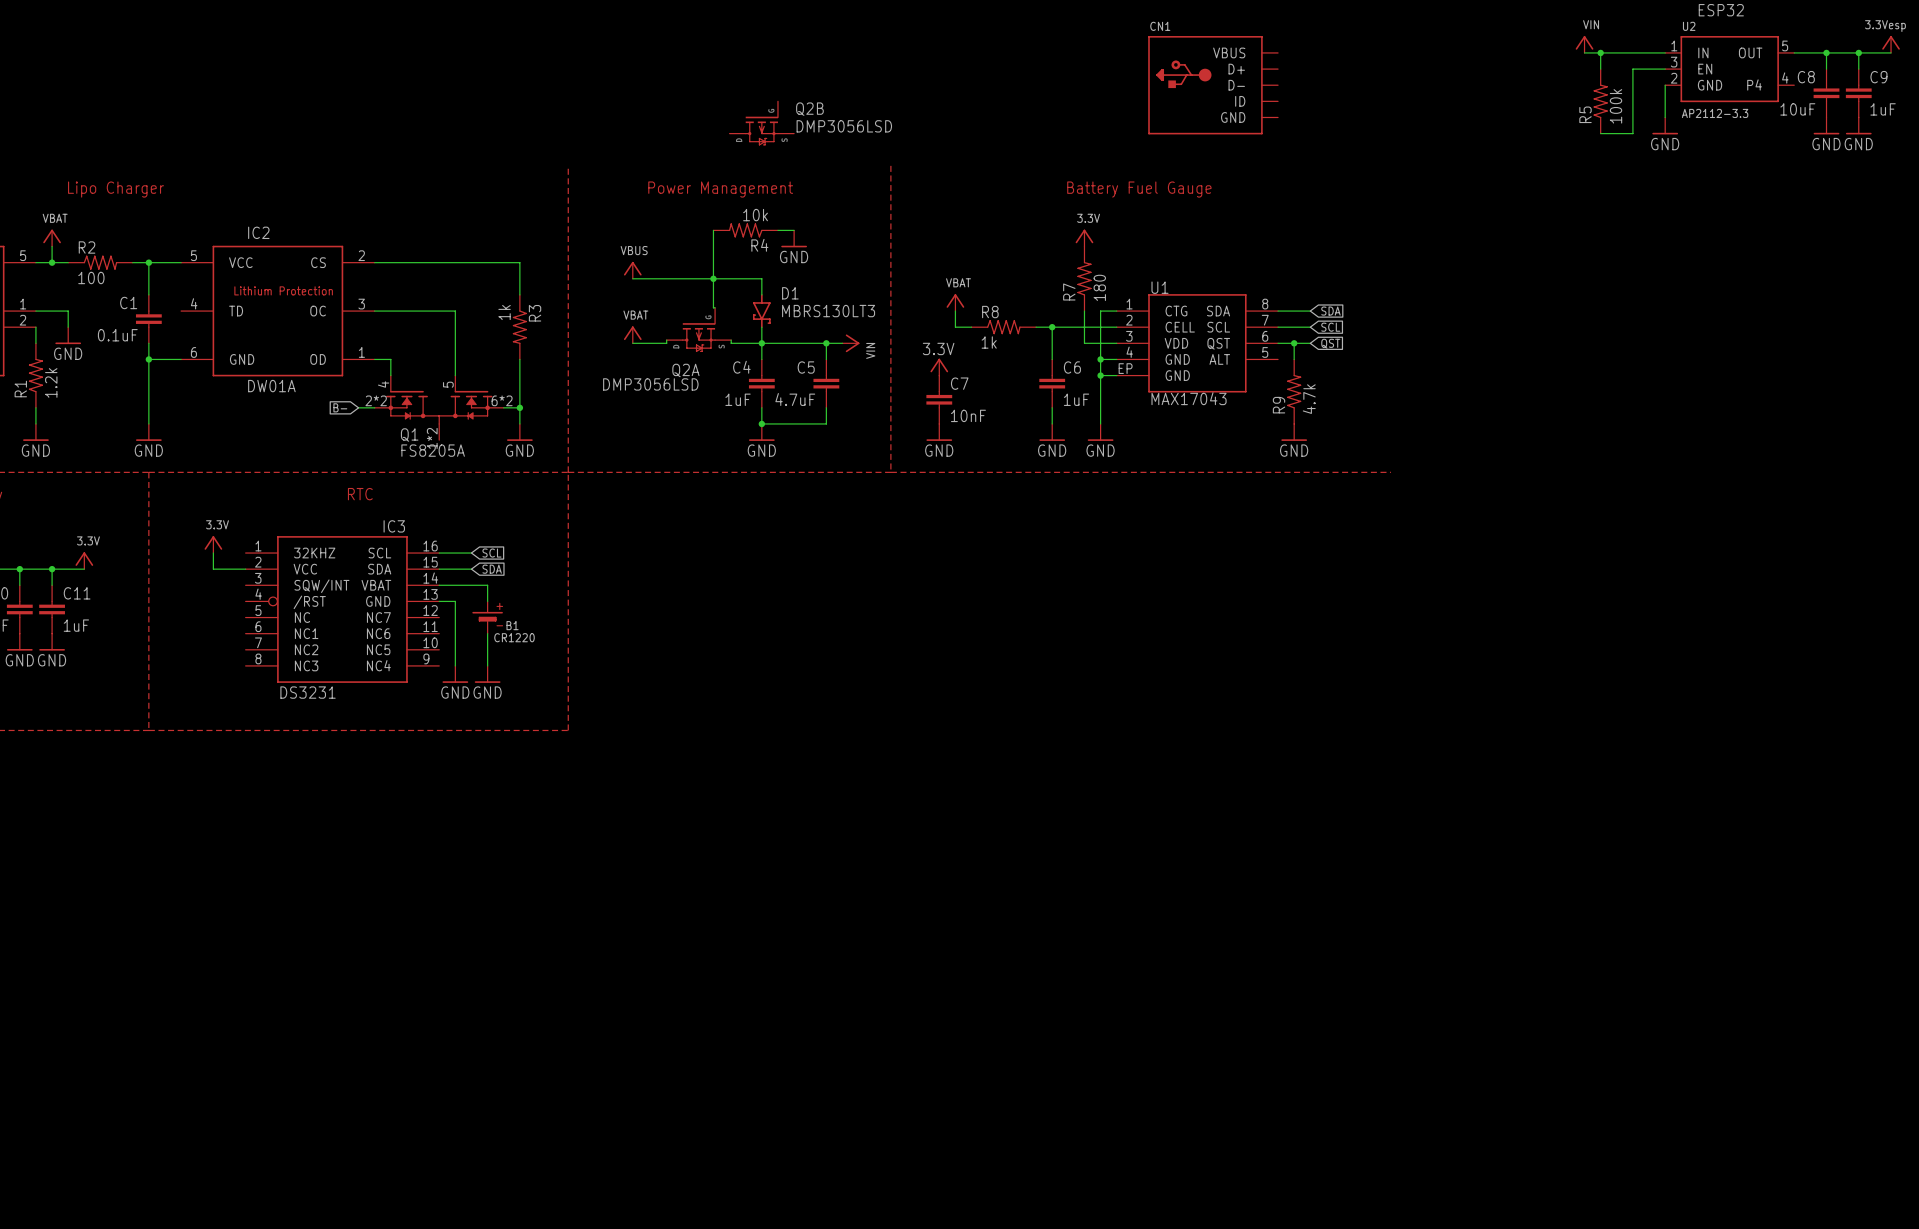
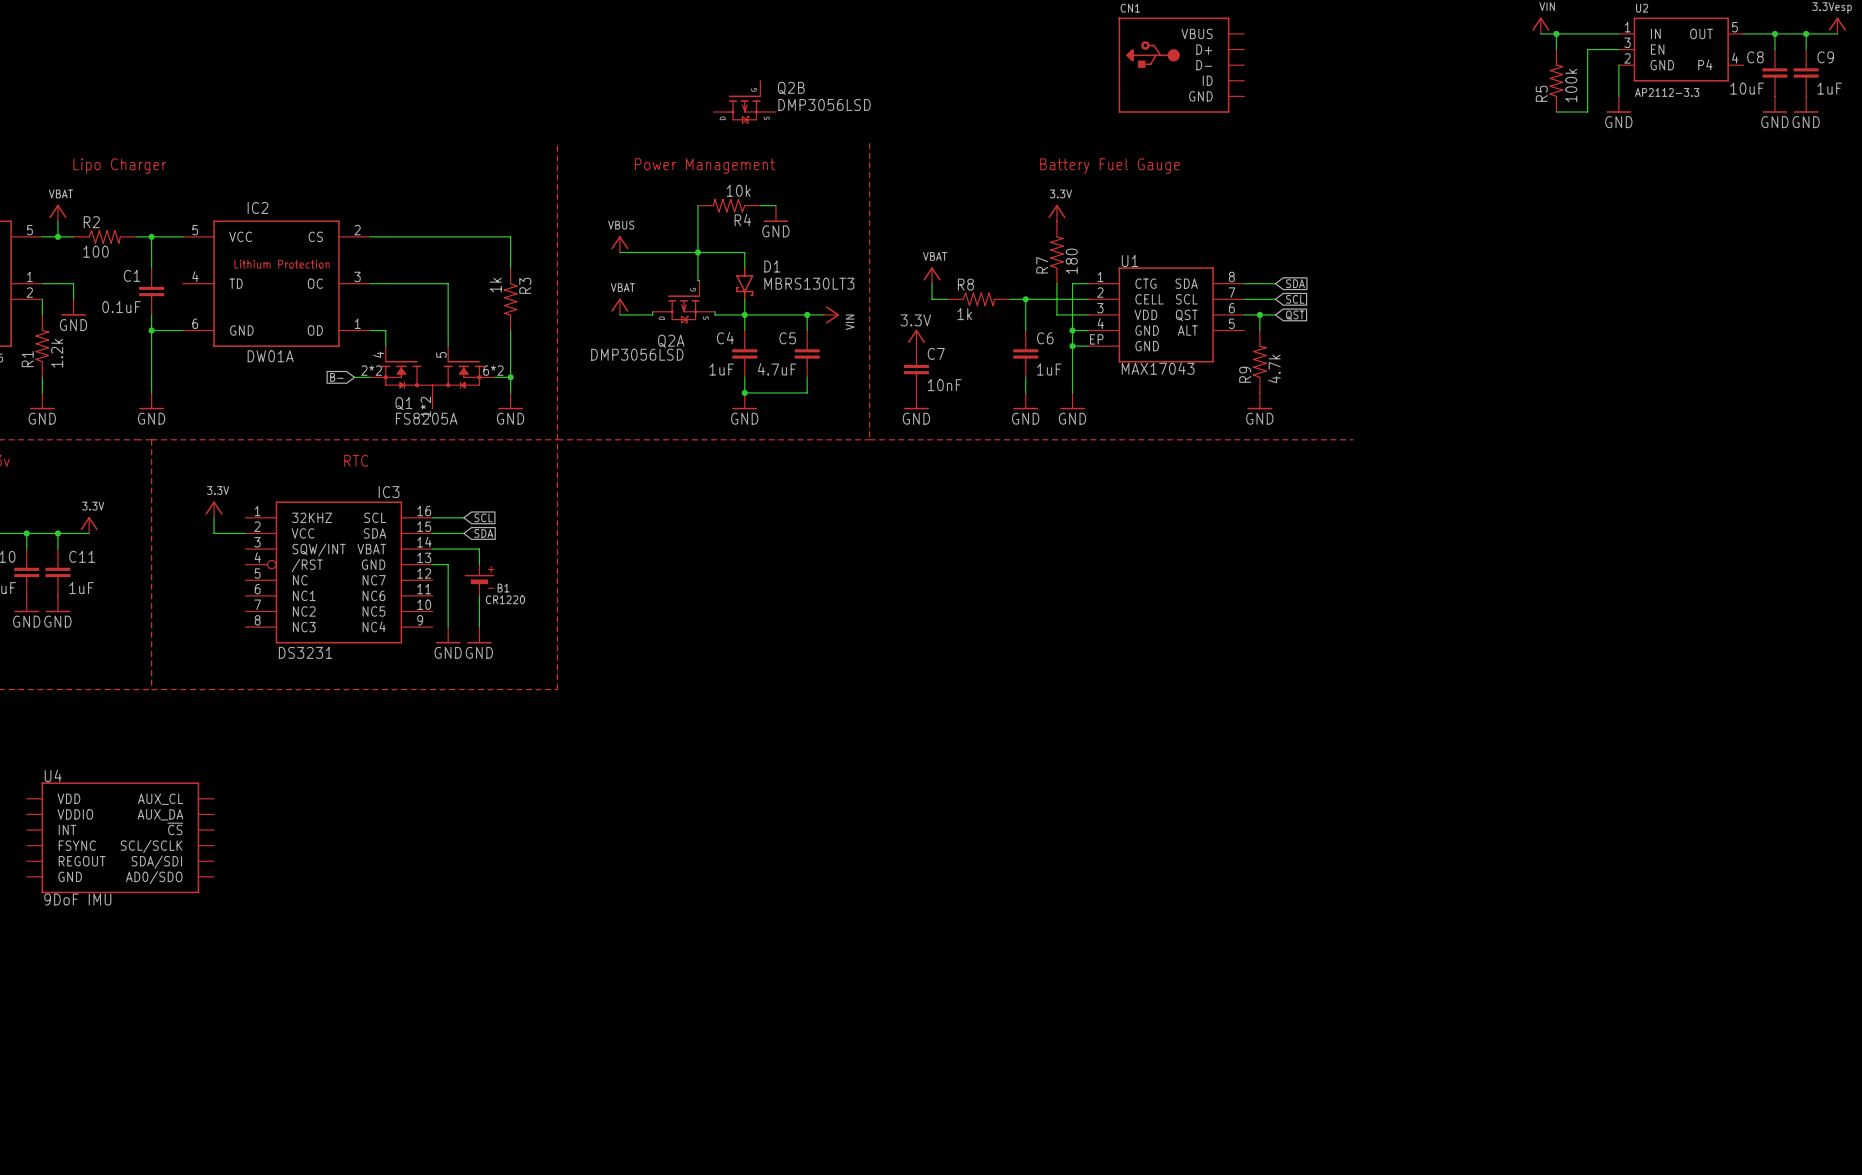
U4: none -> 9DoF IMU (120, 837)

